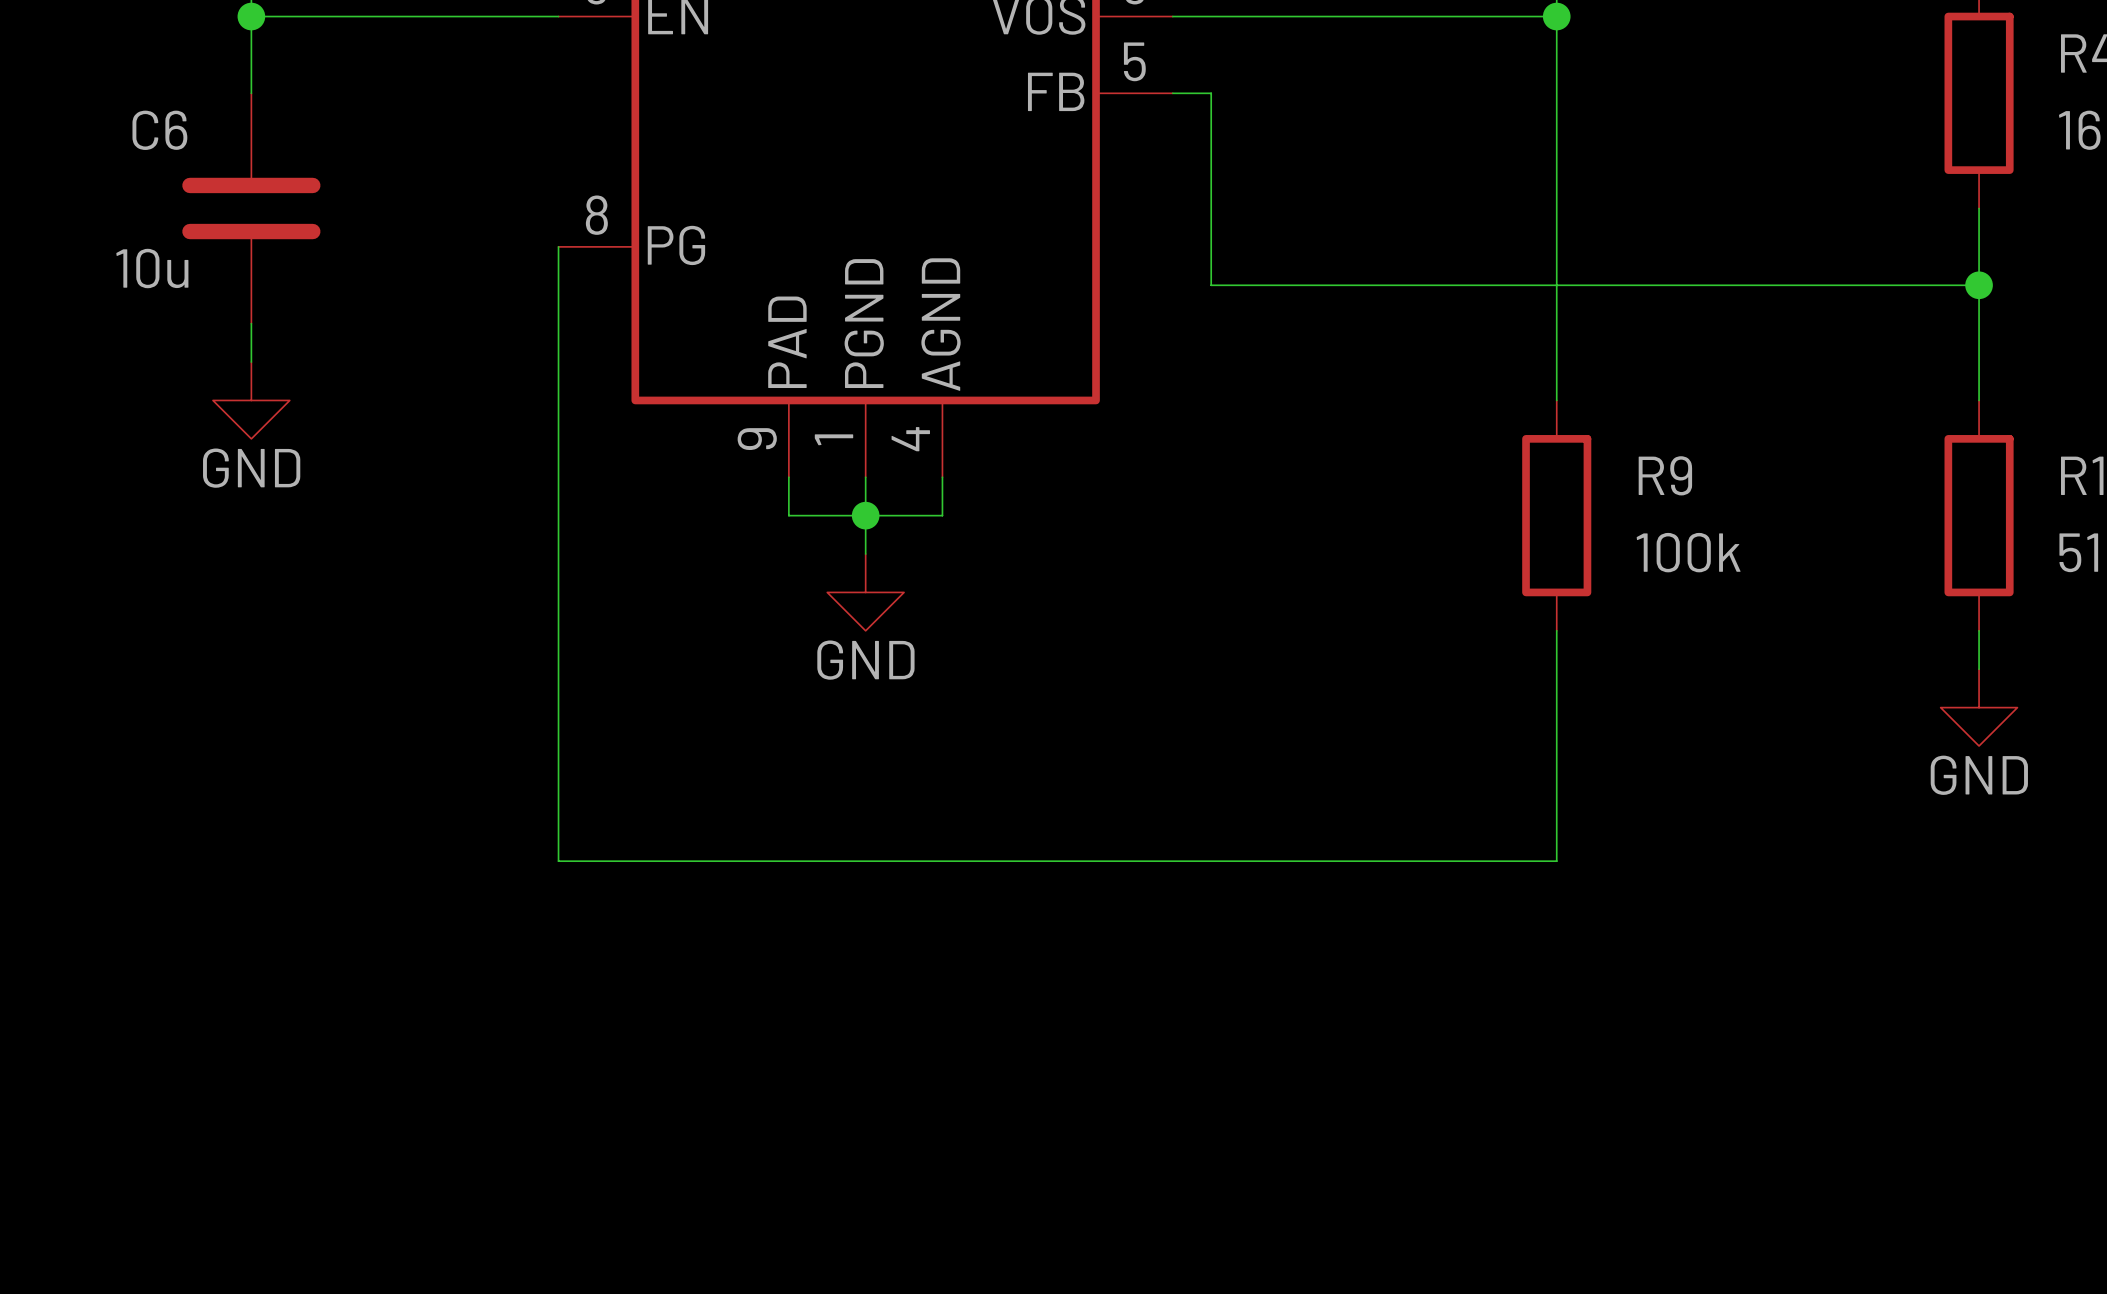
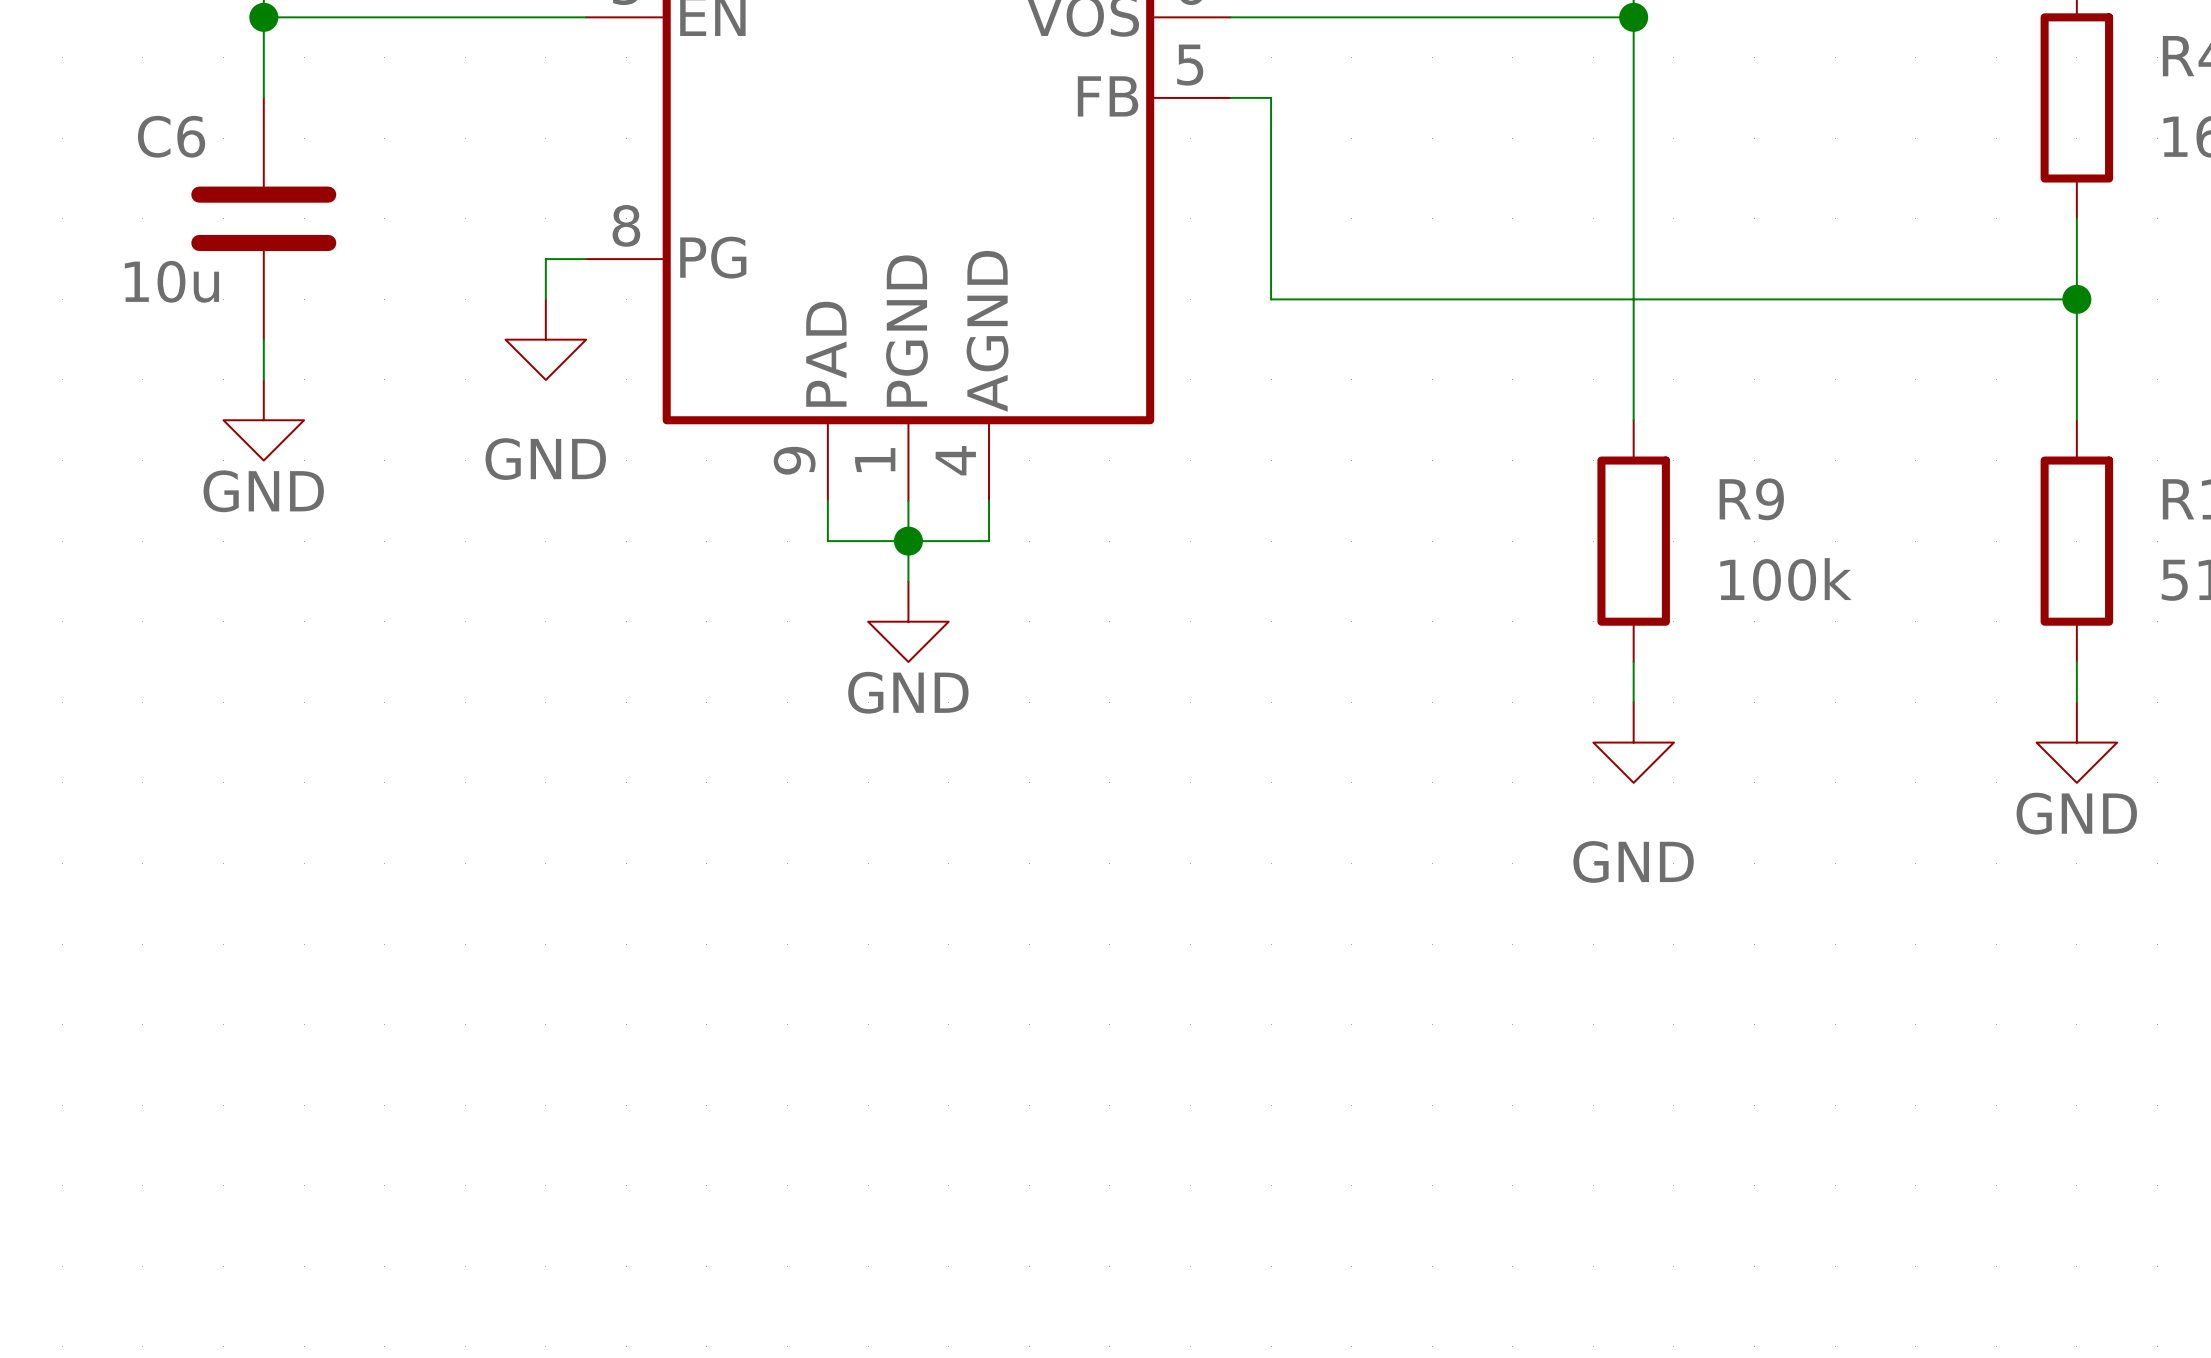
wire: (558, 246) (558, 861) (1556, 861) (1556, 669) -> (586, 259) (545, 259) (545, 299)
power symbol: none -> GND (545, 339)
power symbol: none -> GND (1633, 742)

